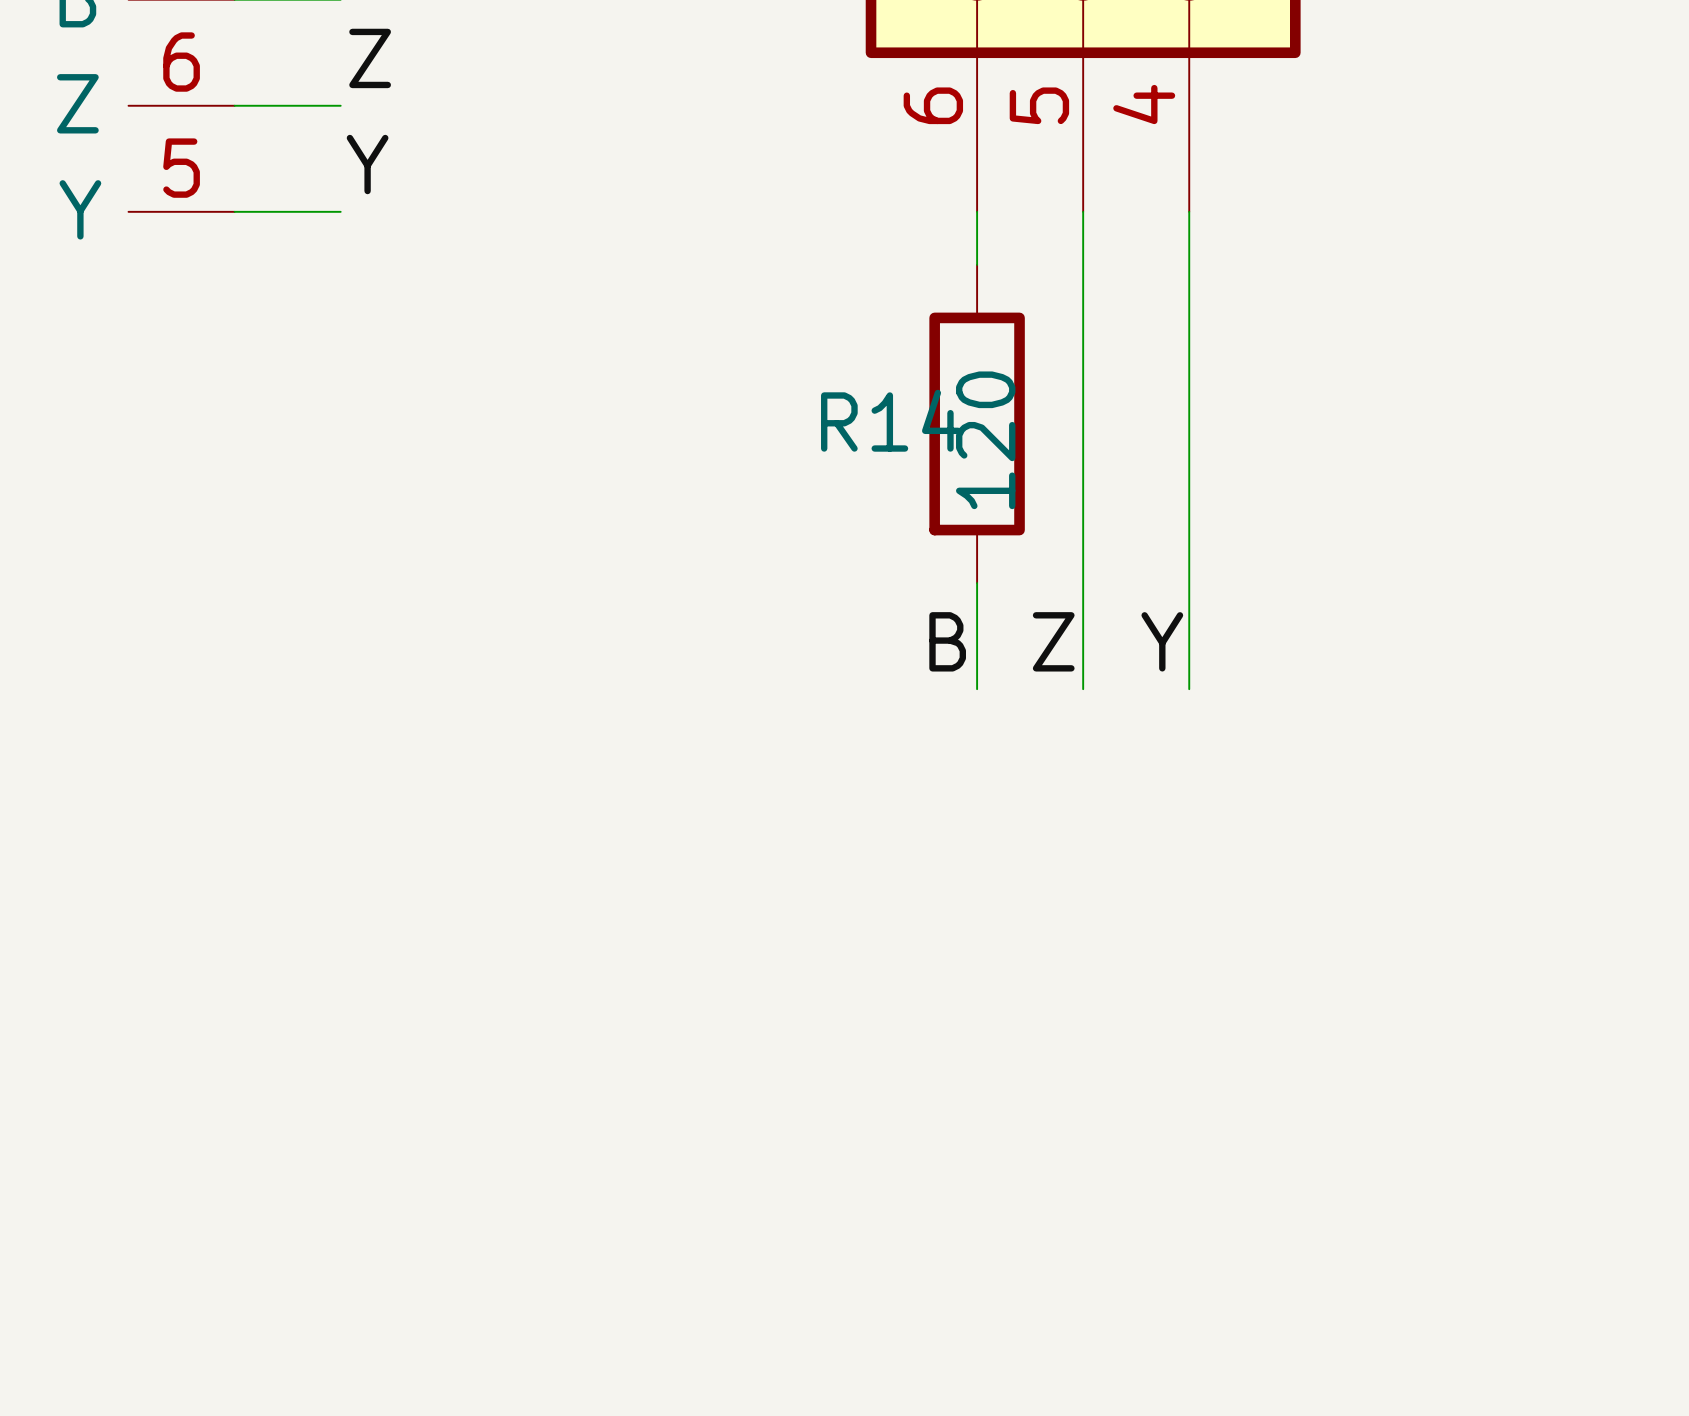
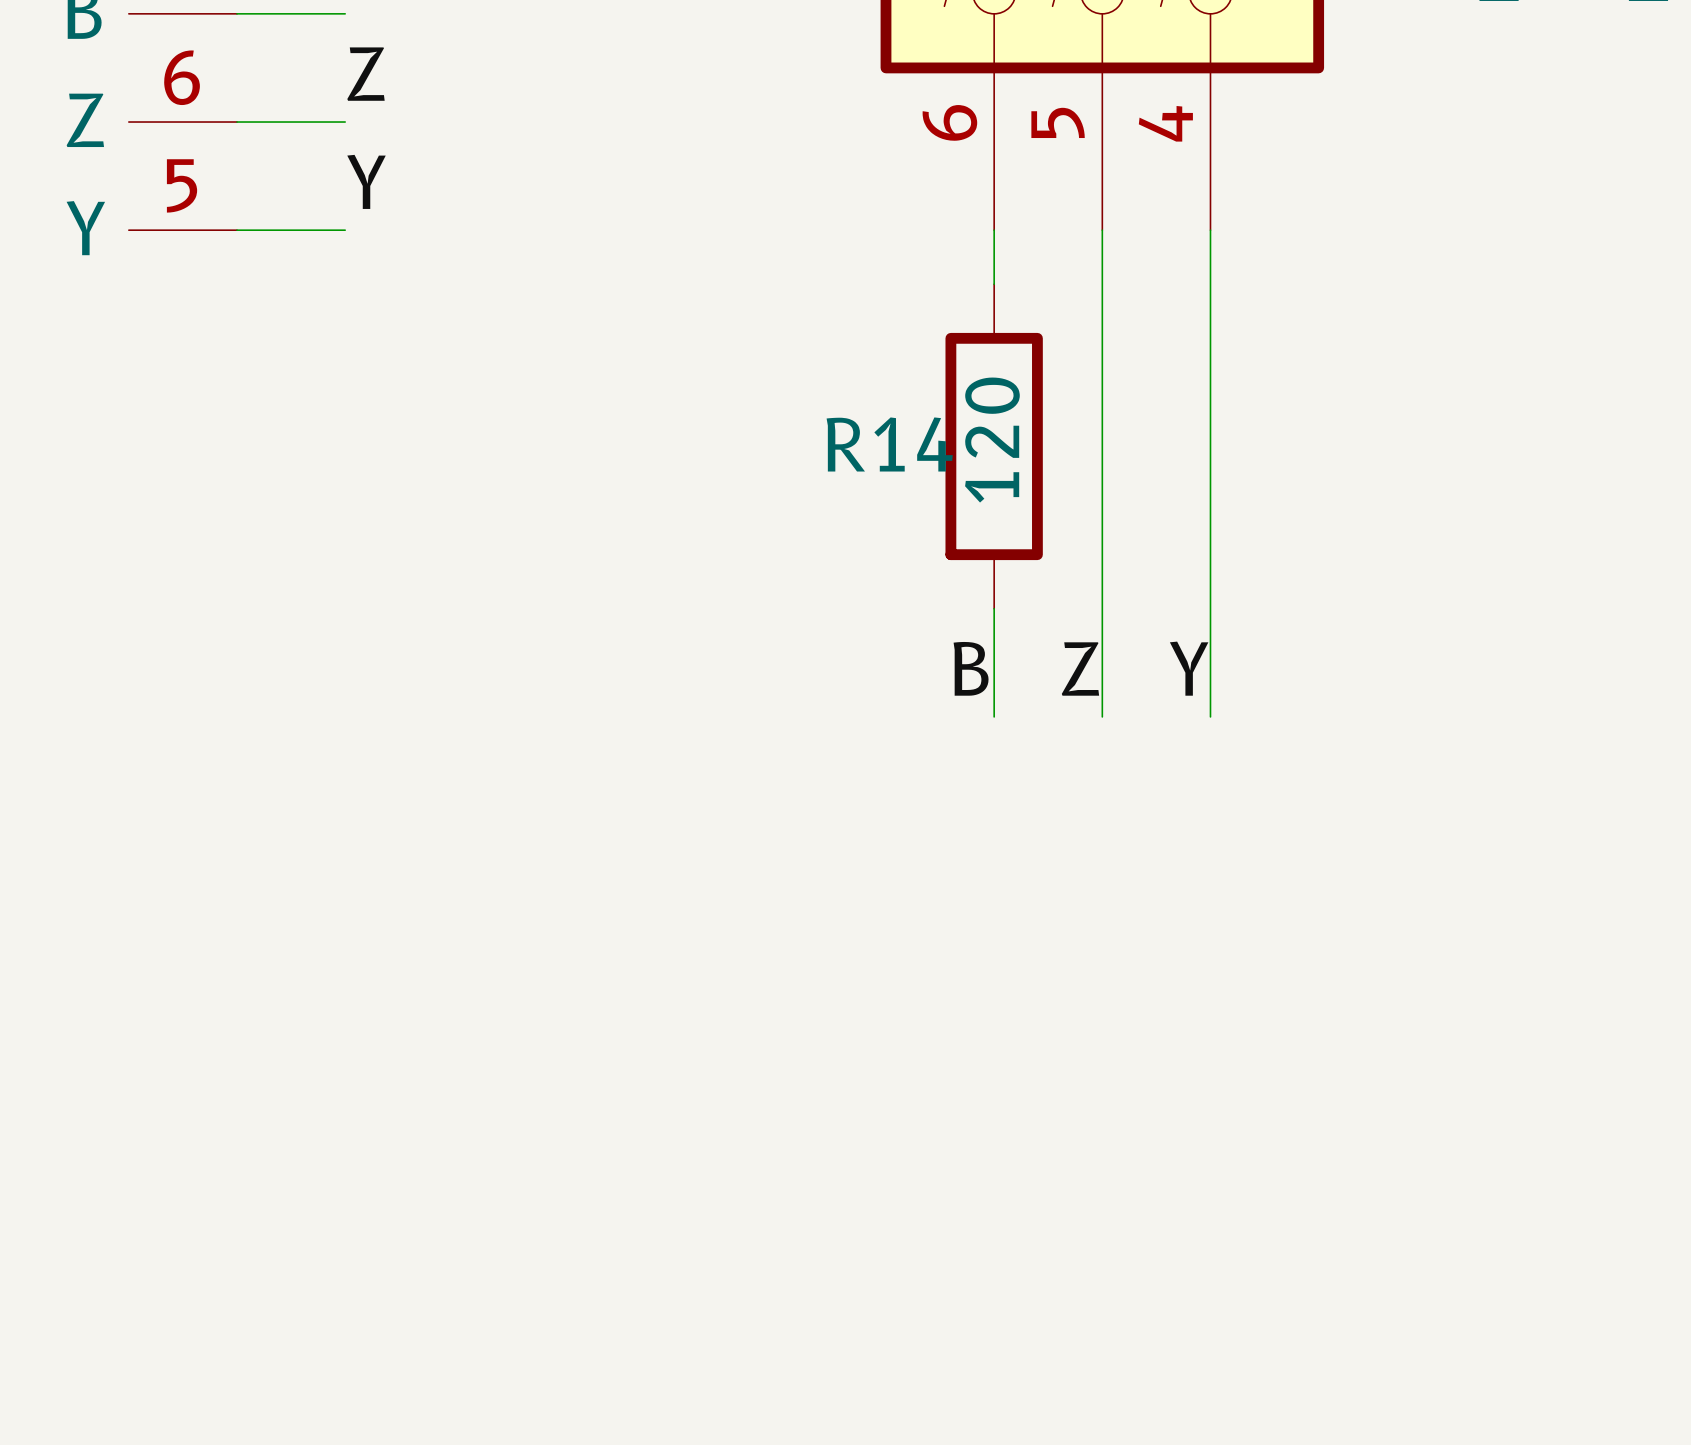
R14 value position: 120 (985, 440) -> 120 (992, 440)

